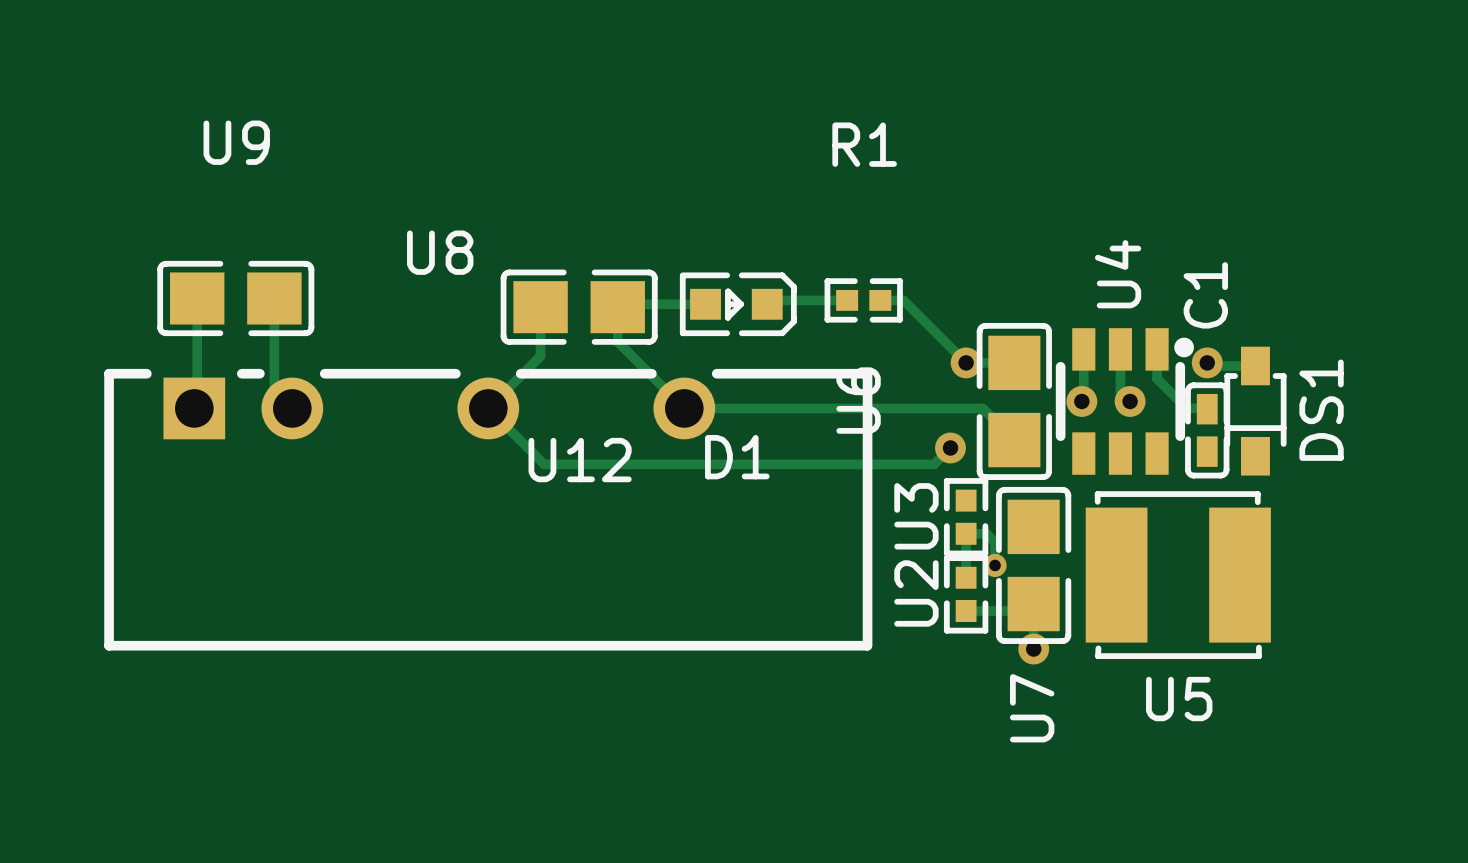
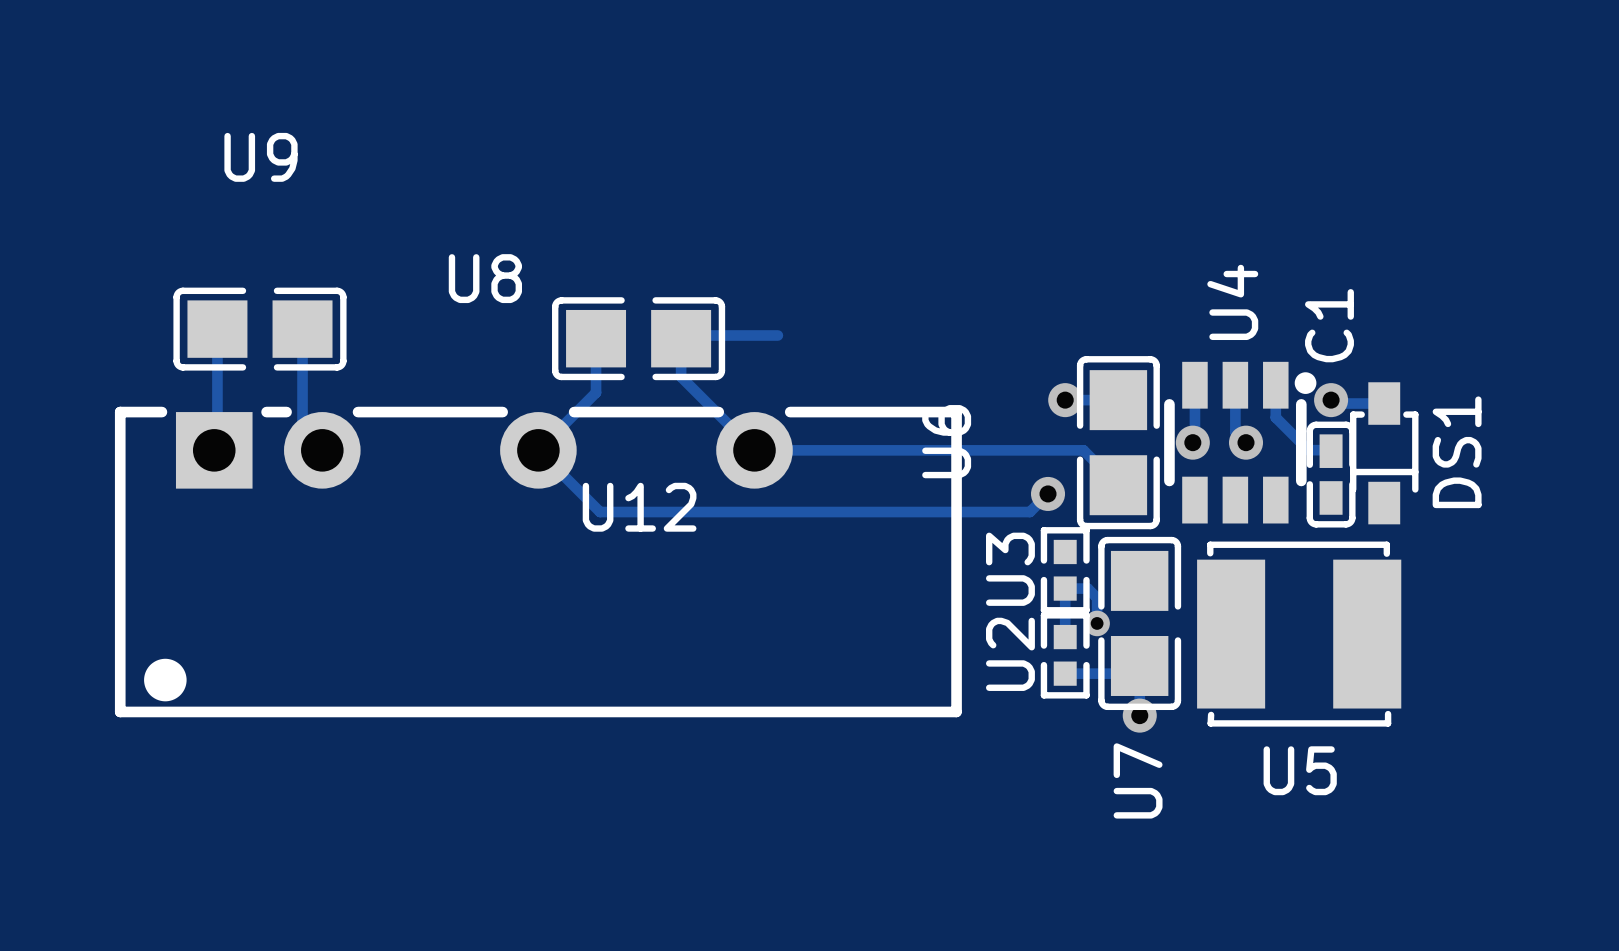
track: (847, 300) (771, 300) (767, 304) -> none
R1: (863, 300) -> none
track: (880, 300) (903, 300) (966, 362) -> none
D1: (738, 304) -> none
U8 footprint: [104, 368, 873, 651] -> [114, 406, 962, 718]

